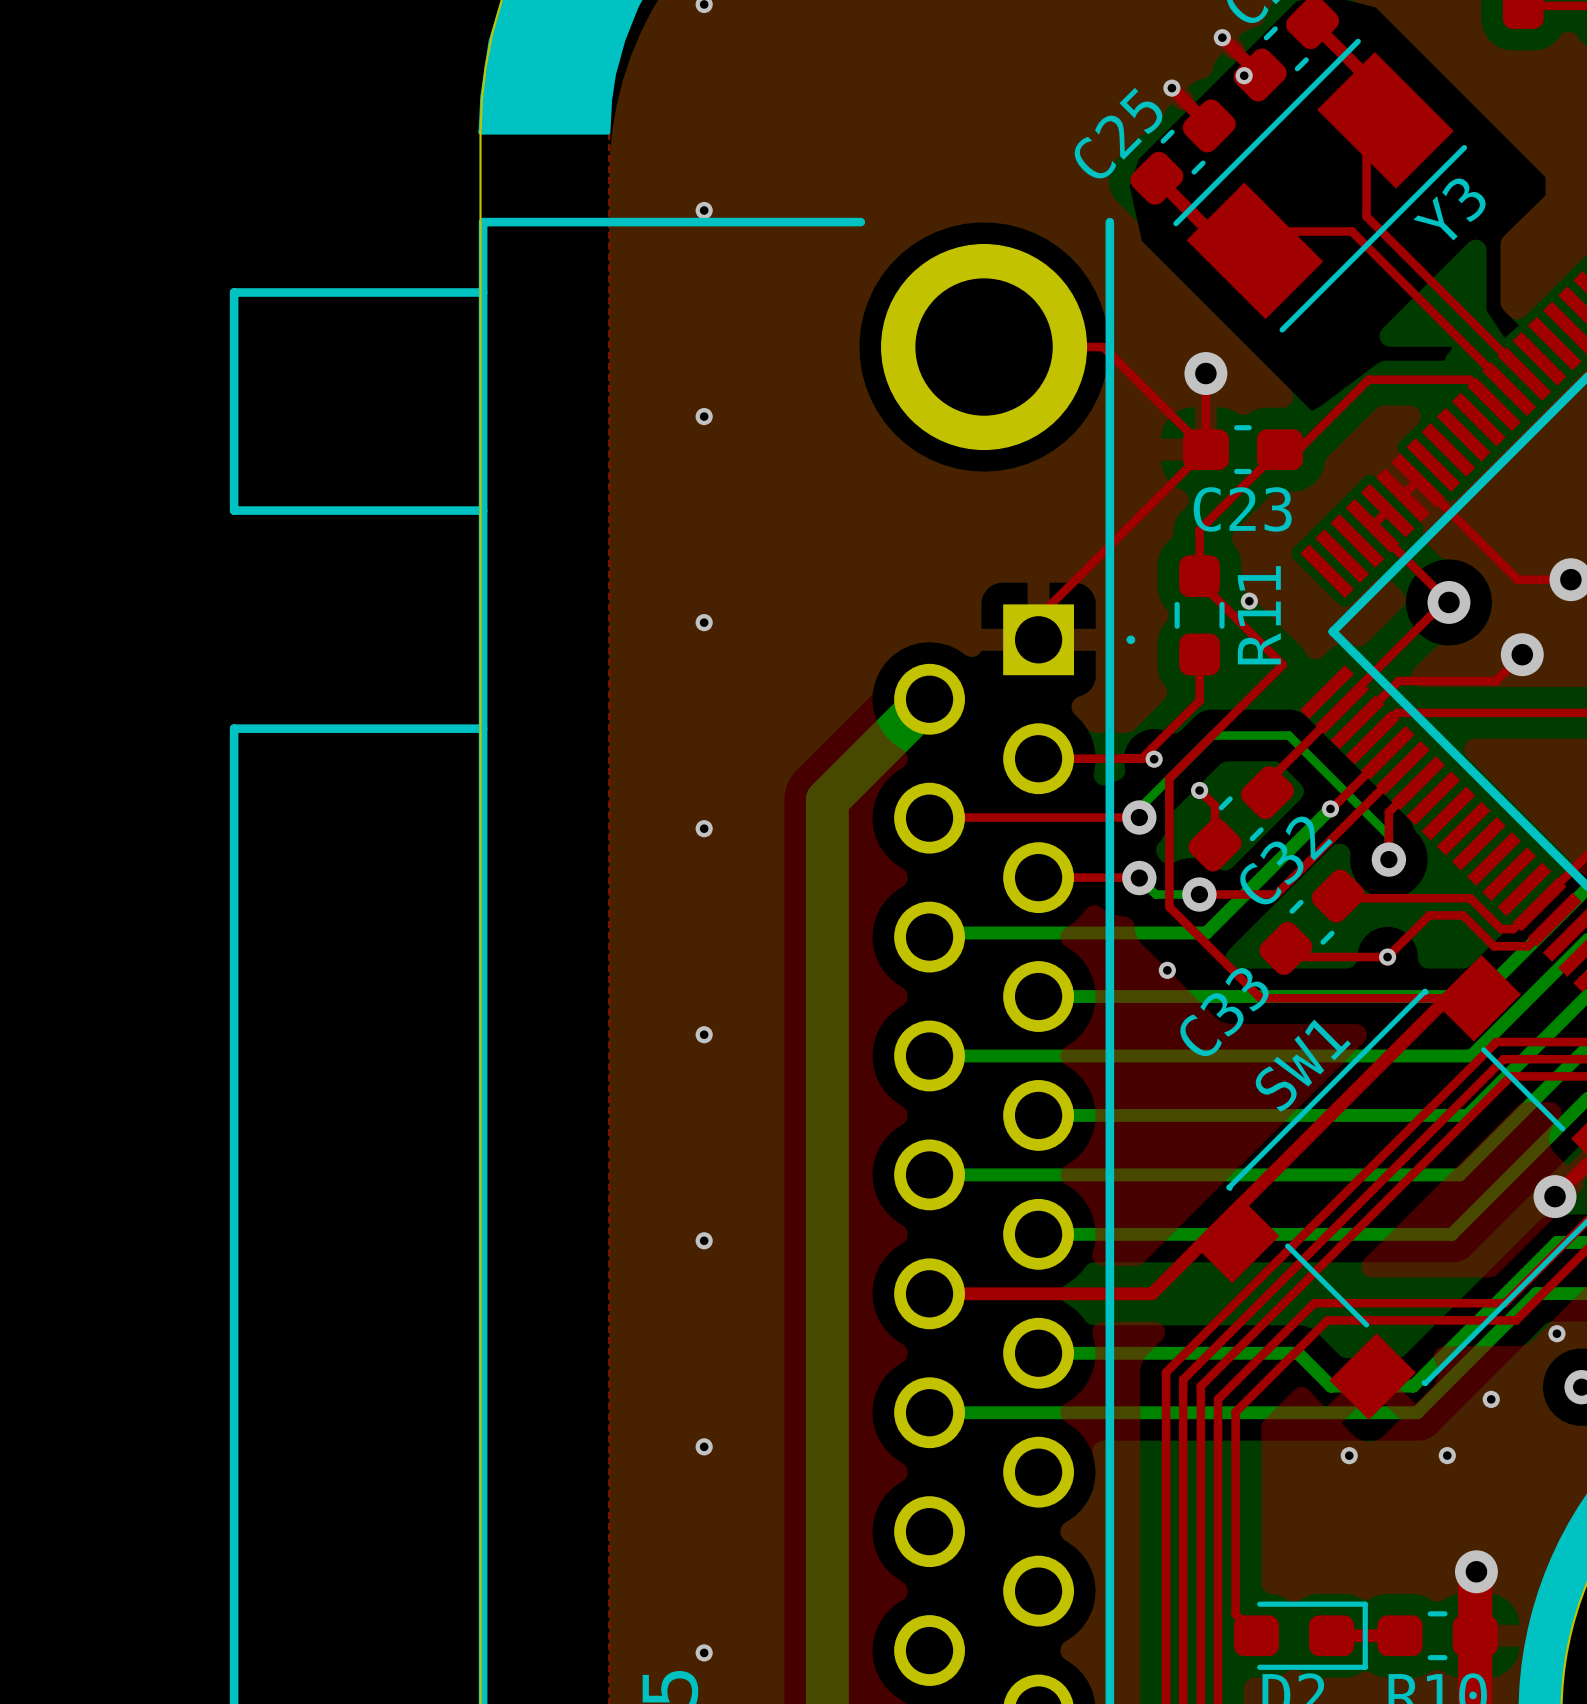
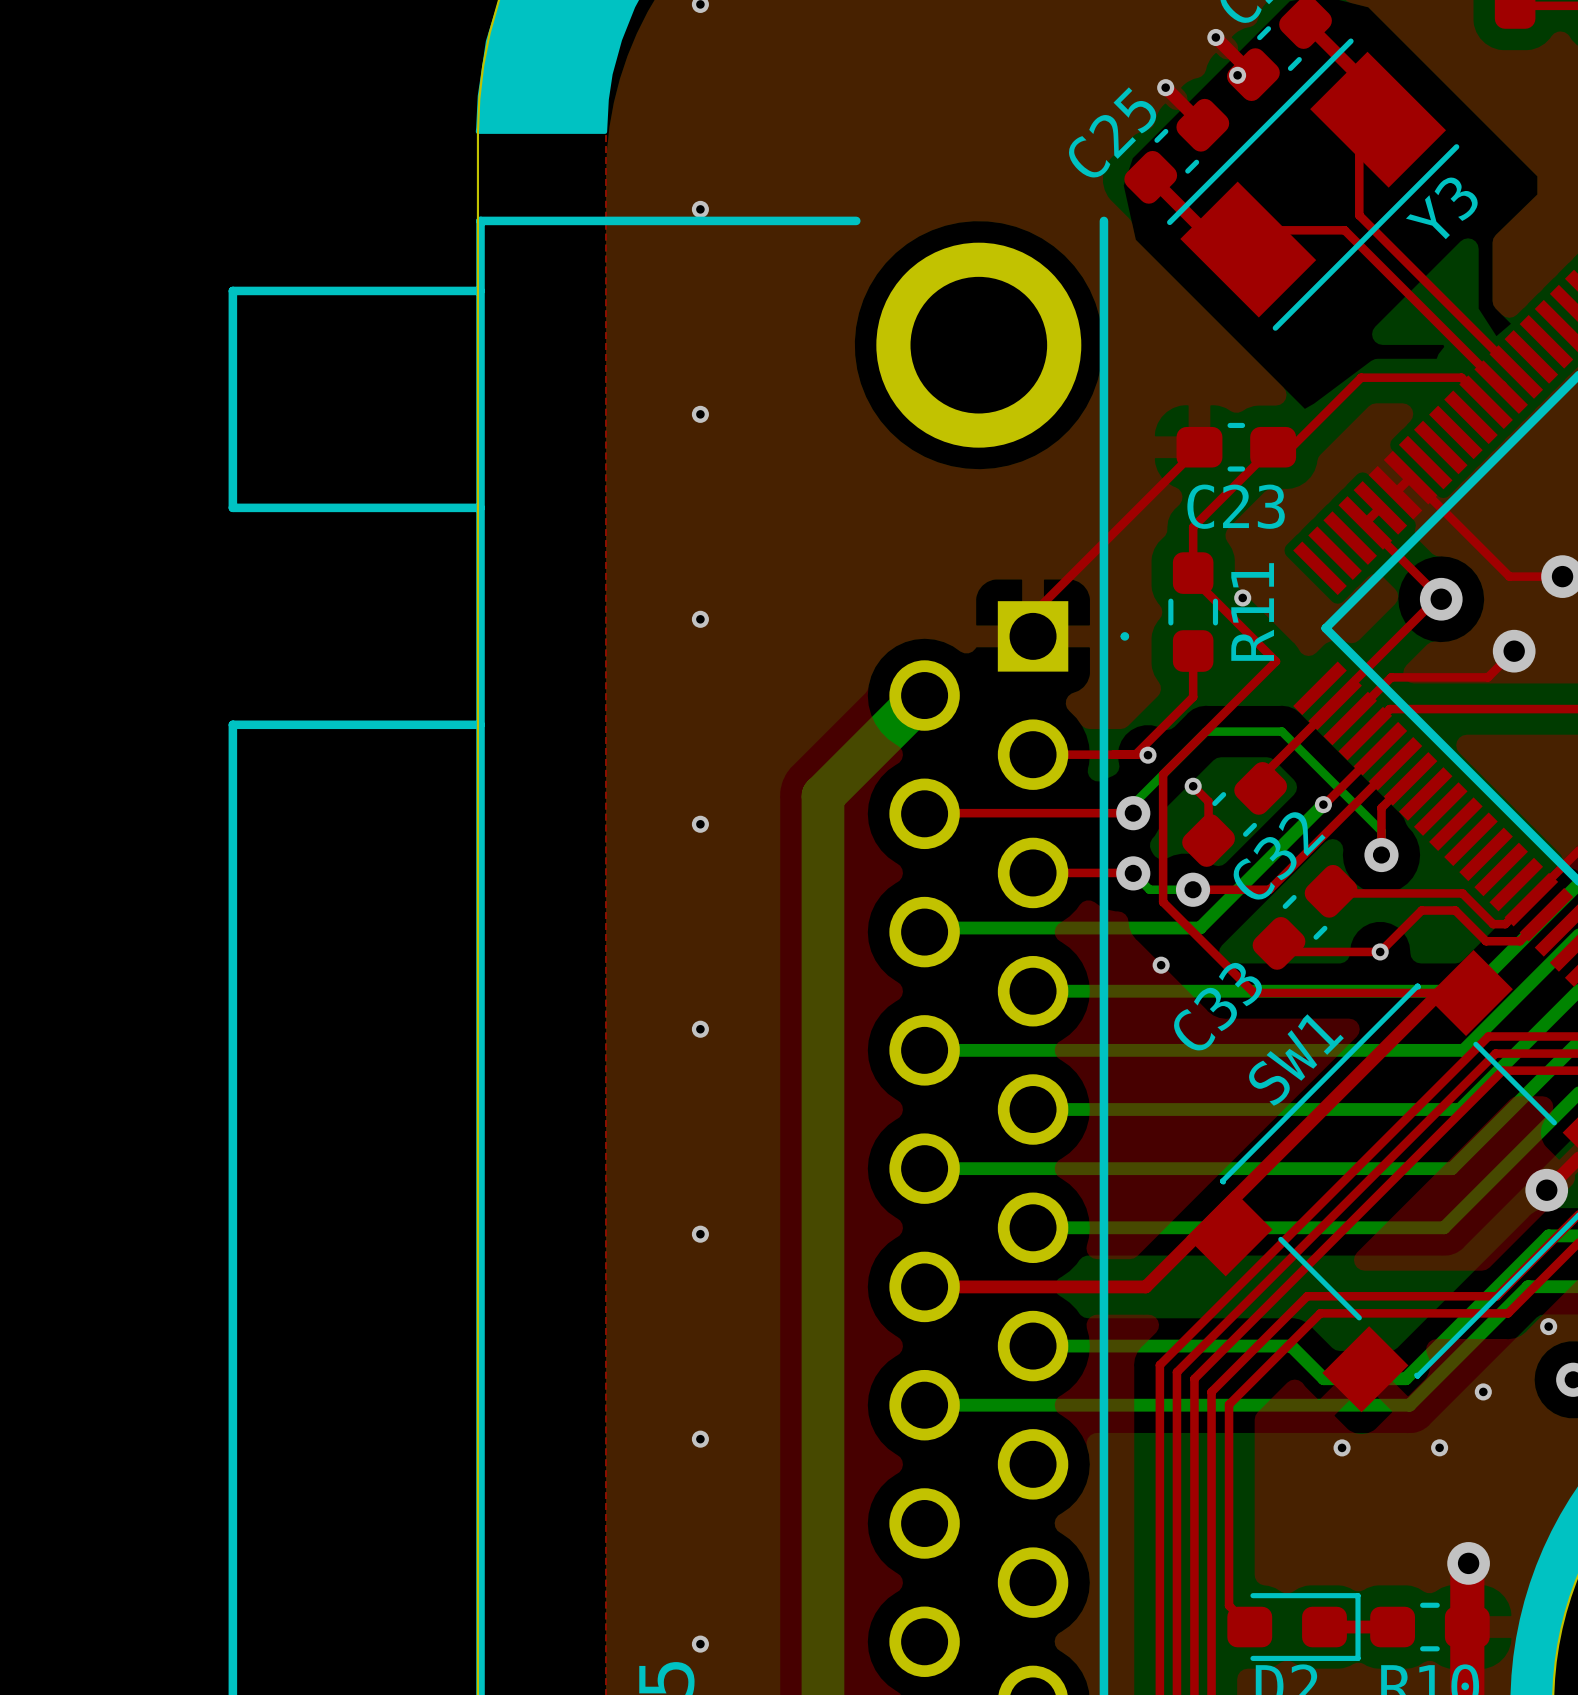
top track: (984, 347) (1103, 347) (1205, 449) (1205, 373) -> none
via: (1205, 373) -> none

